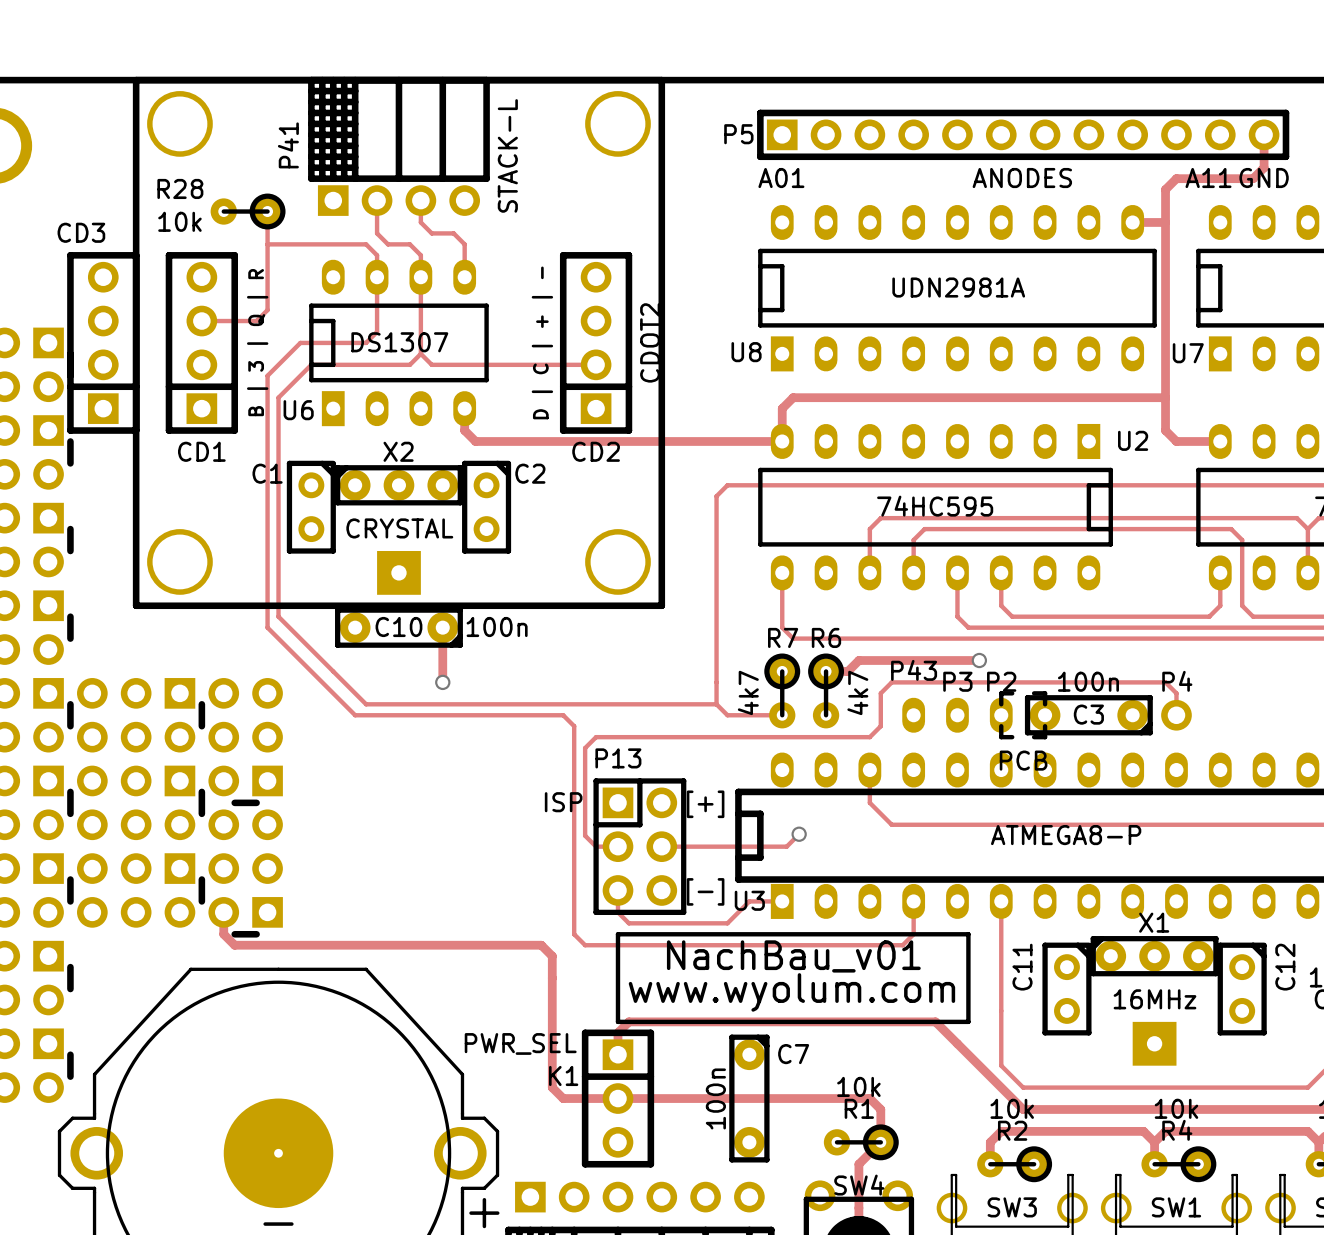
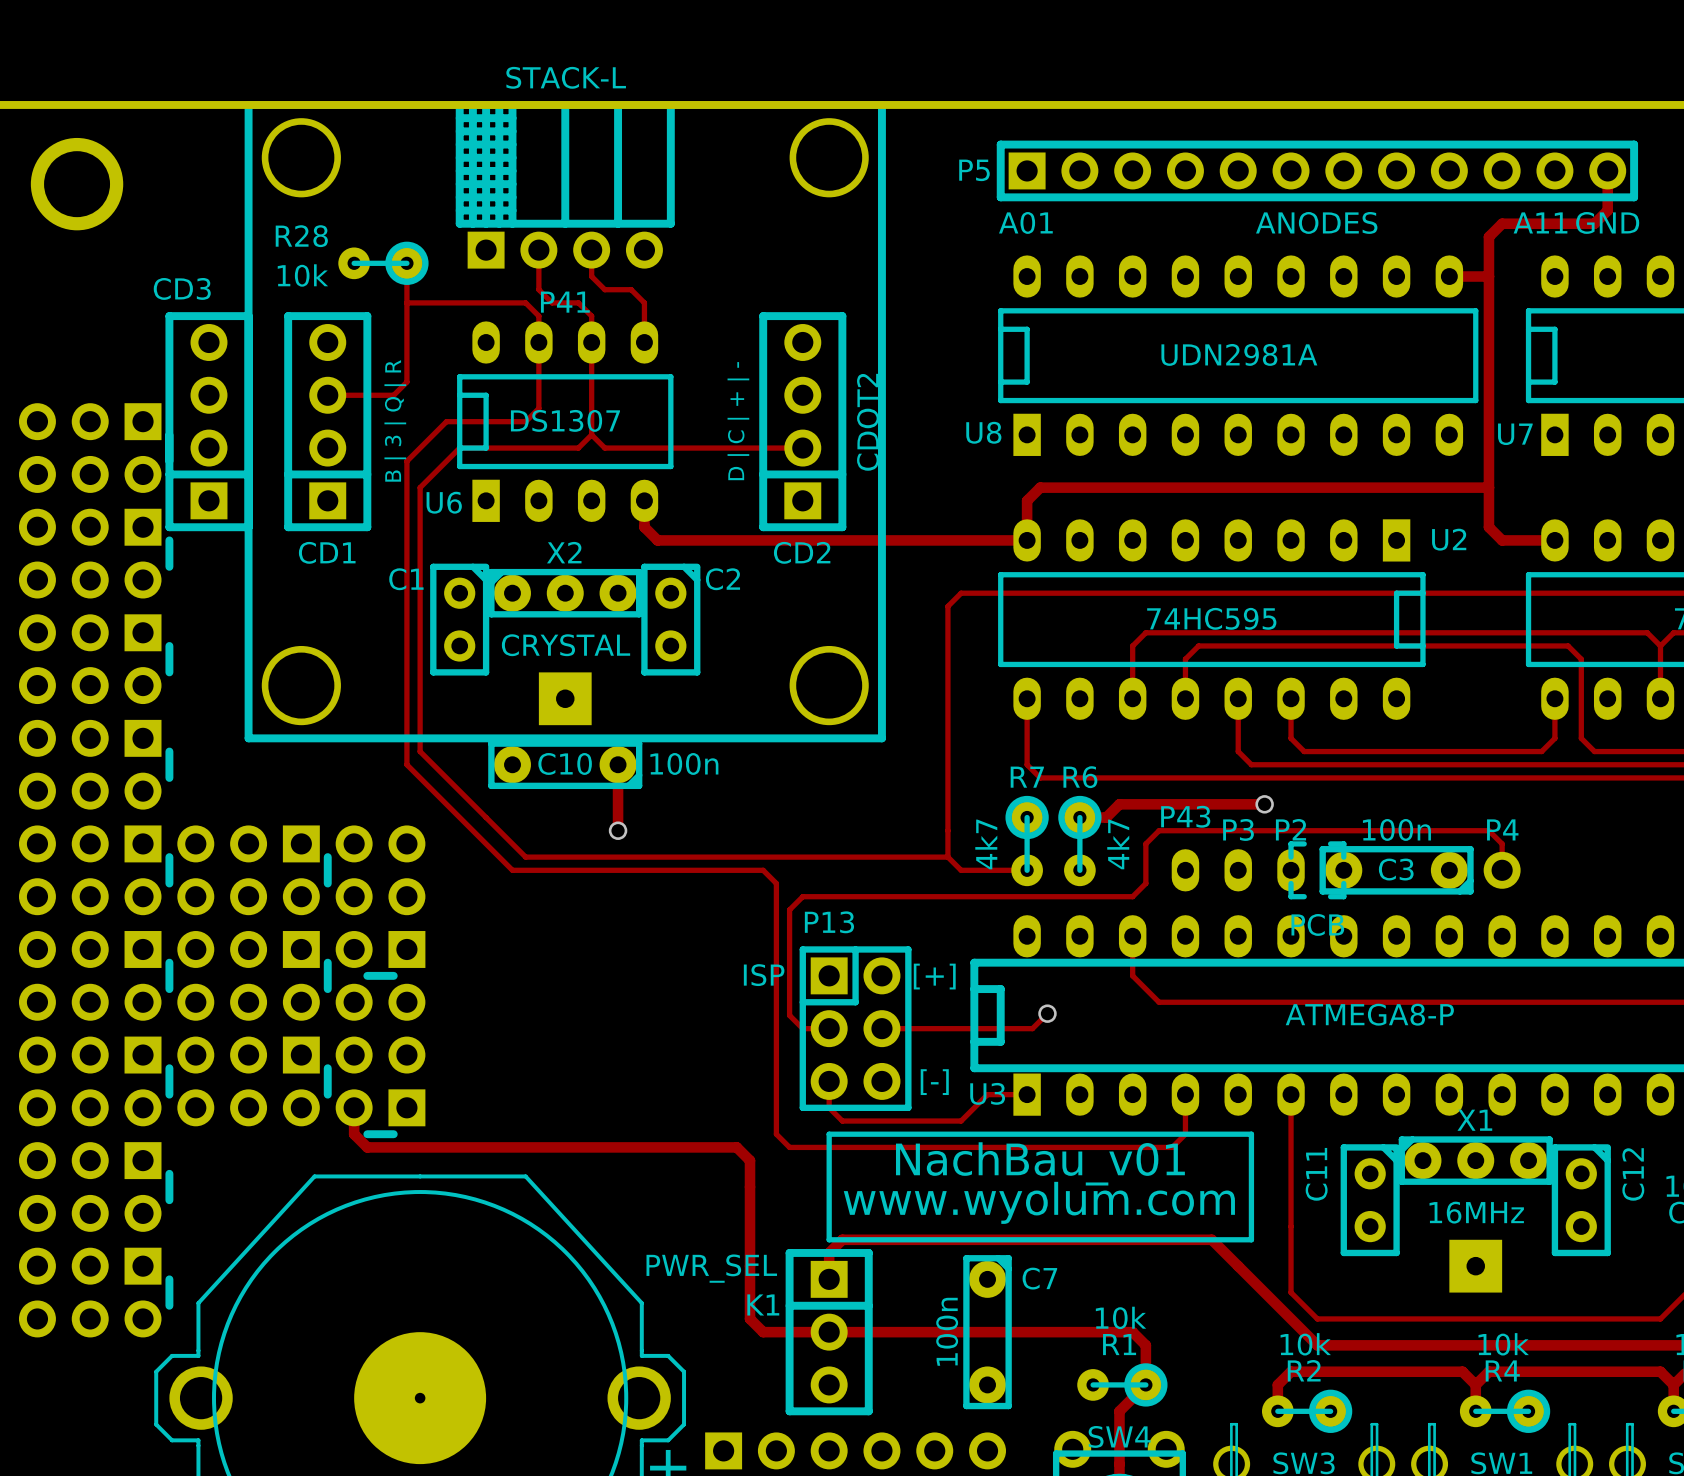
P41 name rotation: 0° (288, 145) -> 90° clockwise (565, 302)
P41 name position: P41 (288, 145) -> P41 (565, 302)
P41 value rotation: 0° (507, 155) -> 90° clockwise (566, 77)
P41 value position: STACK-L (507, 155) -> STACK-L (566, 77)

